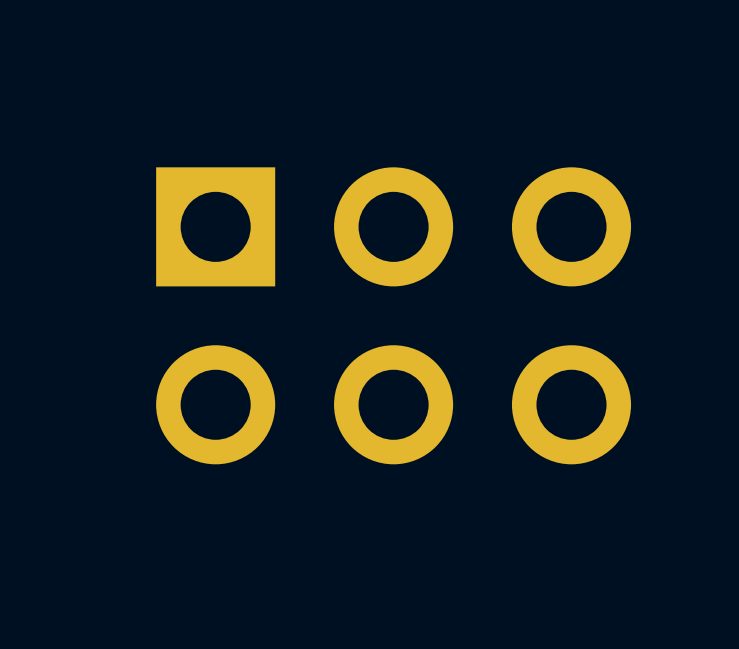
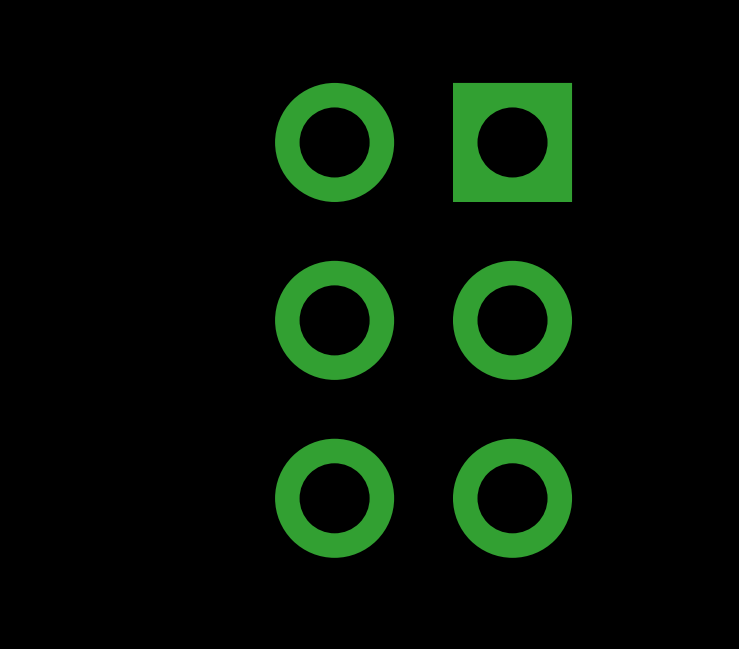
part rotation: 0° (393, 315) -> 90° clockwise (423, 320)

